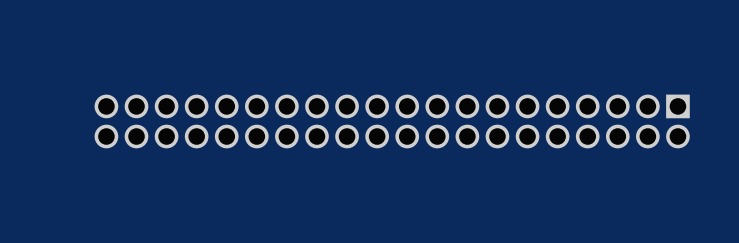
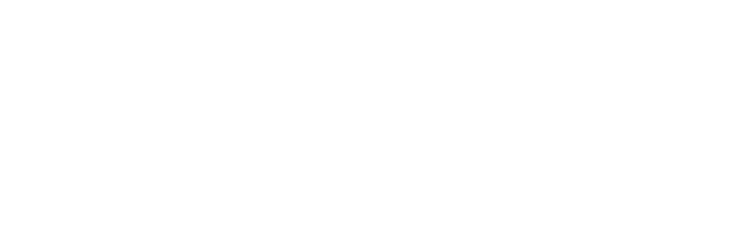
part: (392, 121) -> none

